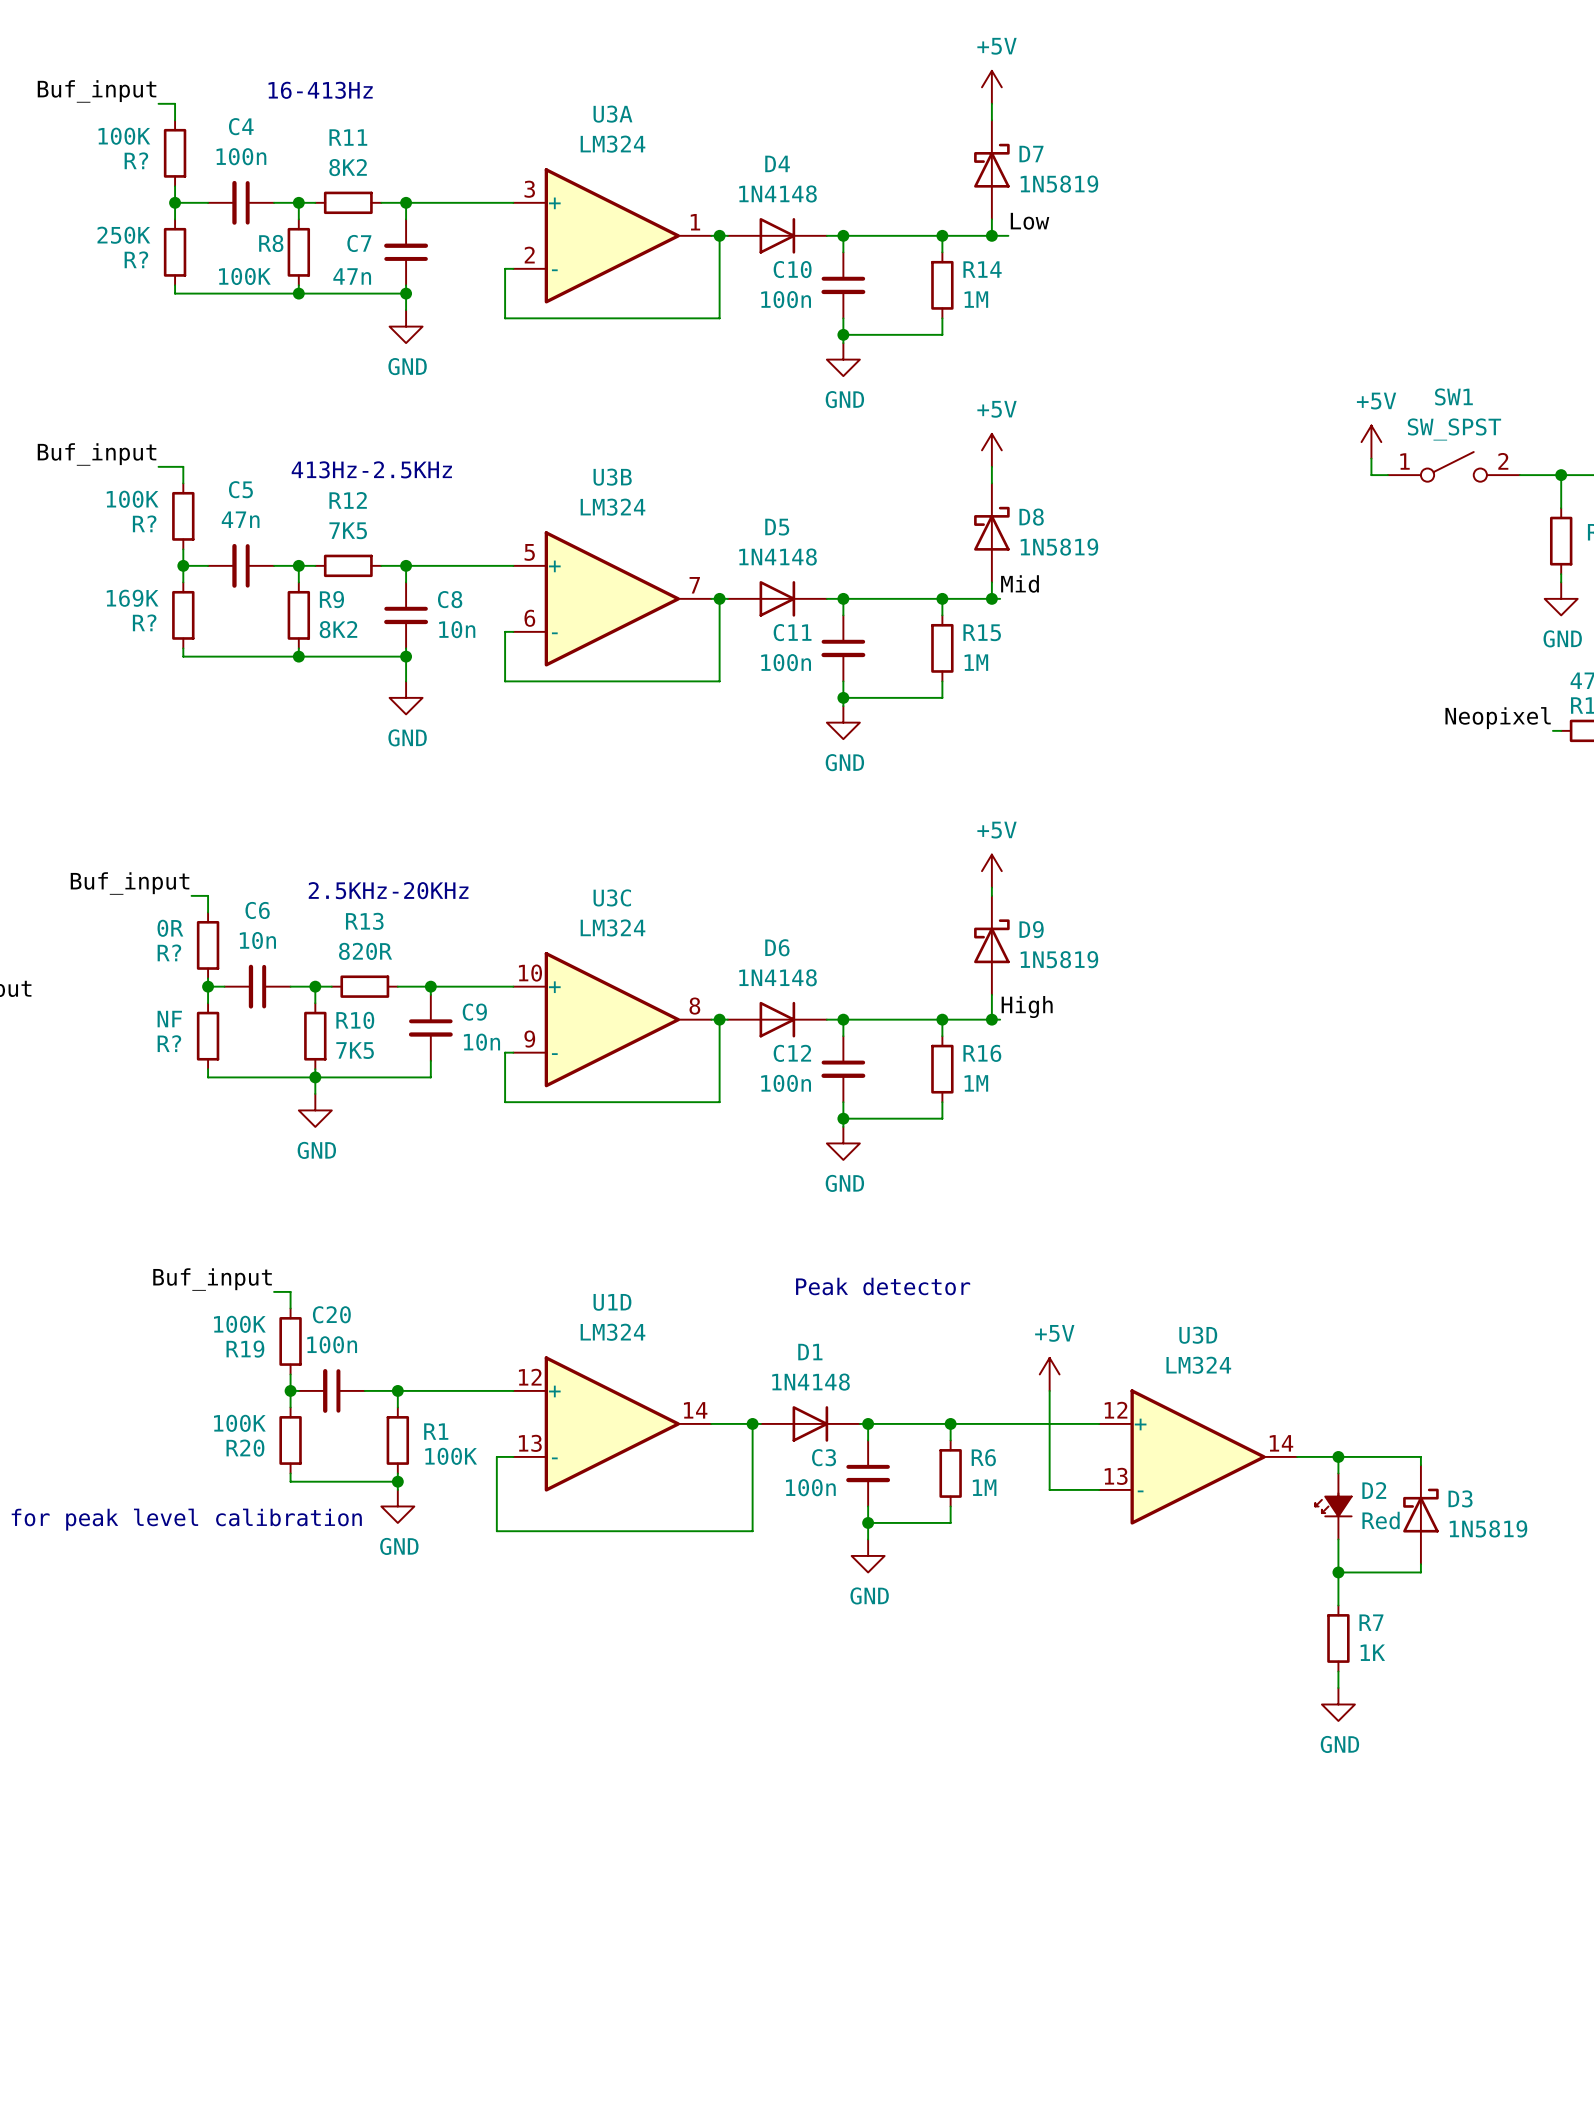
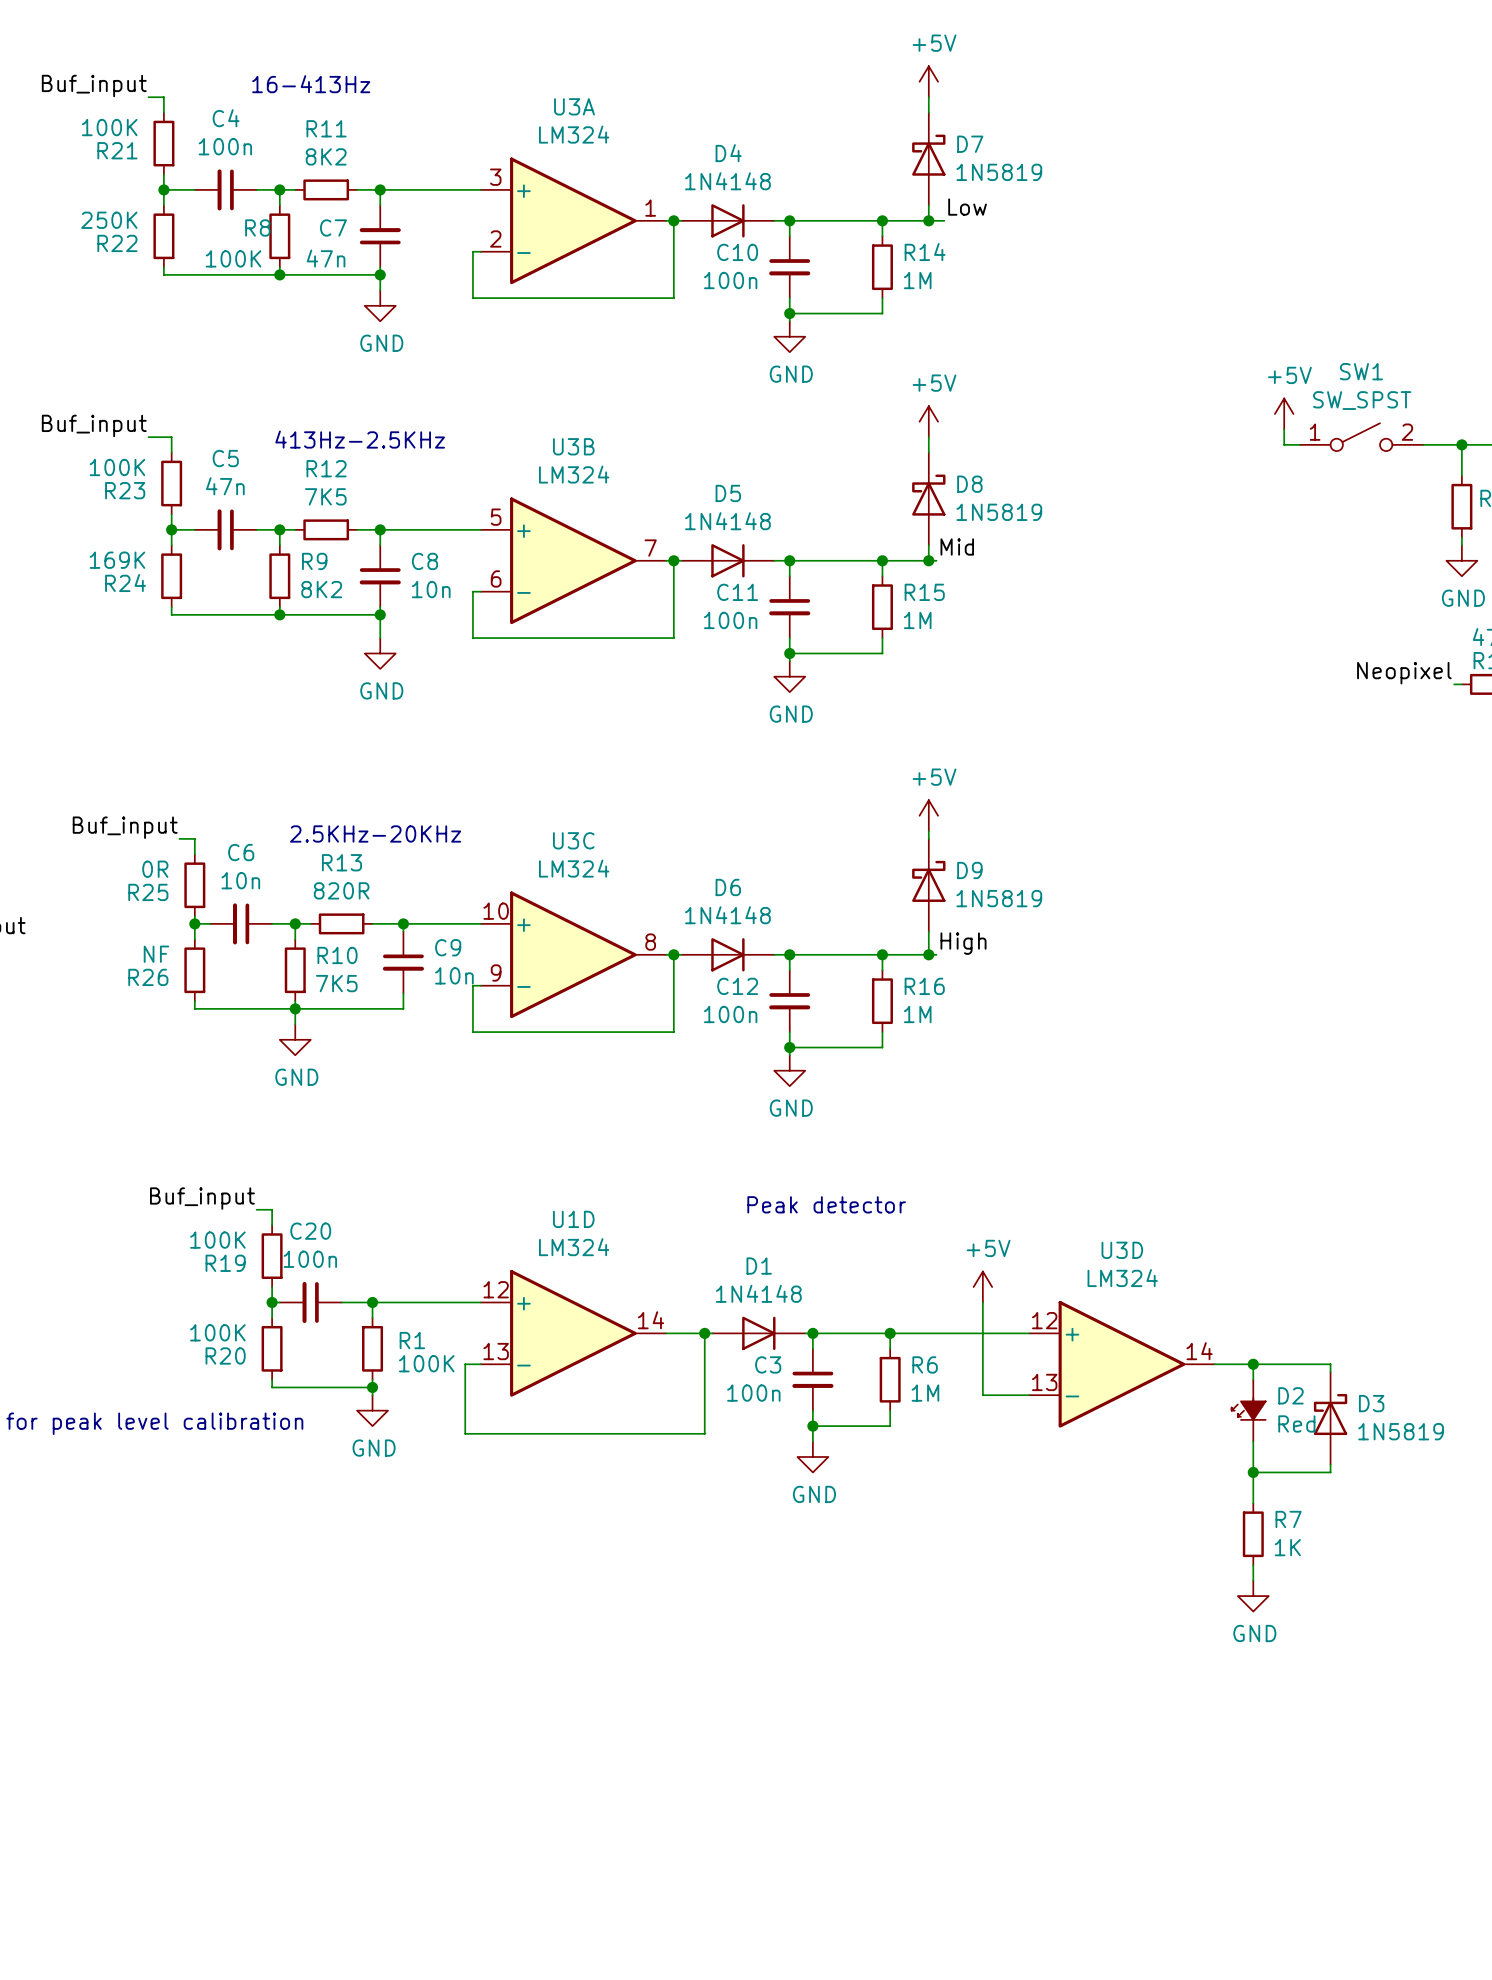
R? name: R? (136, 160) -> R21 (117, 150)
R? name: R? (136, 259) -> R22 (117, 243)
R? name: R? (144, 523) -> R23 (125, 490)
R? name: R? (144, 622) -> R24 (125, 583)
R? name: R? (169, 952) -> R25 (148, 892)
R? name: R? (169, 1043) -> R26 (148, 977)

